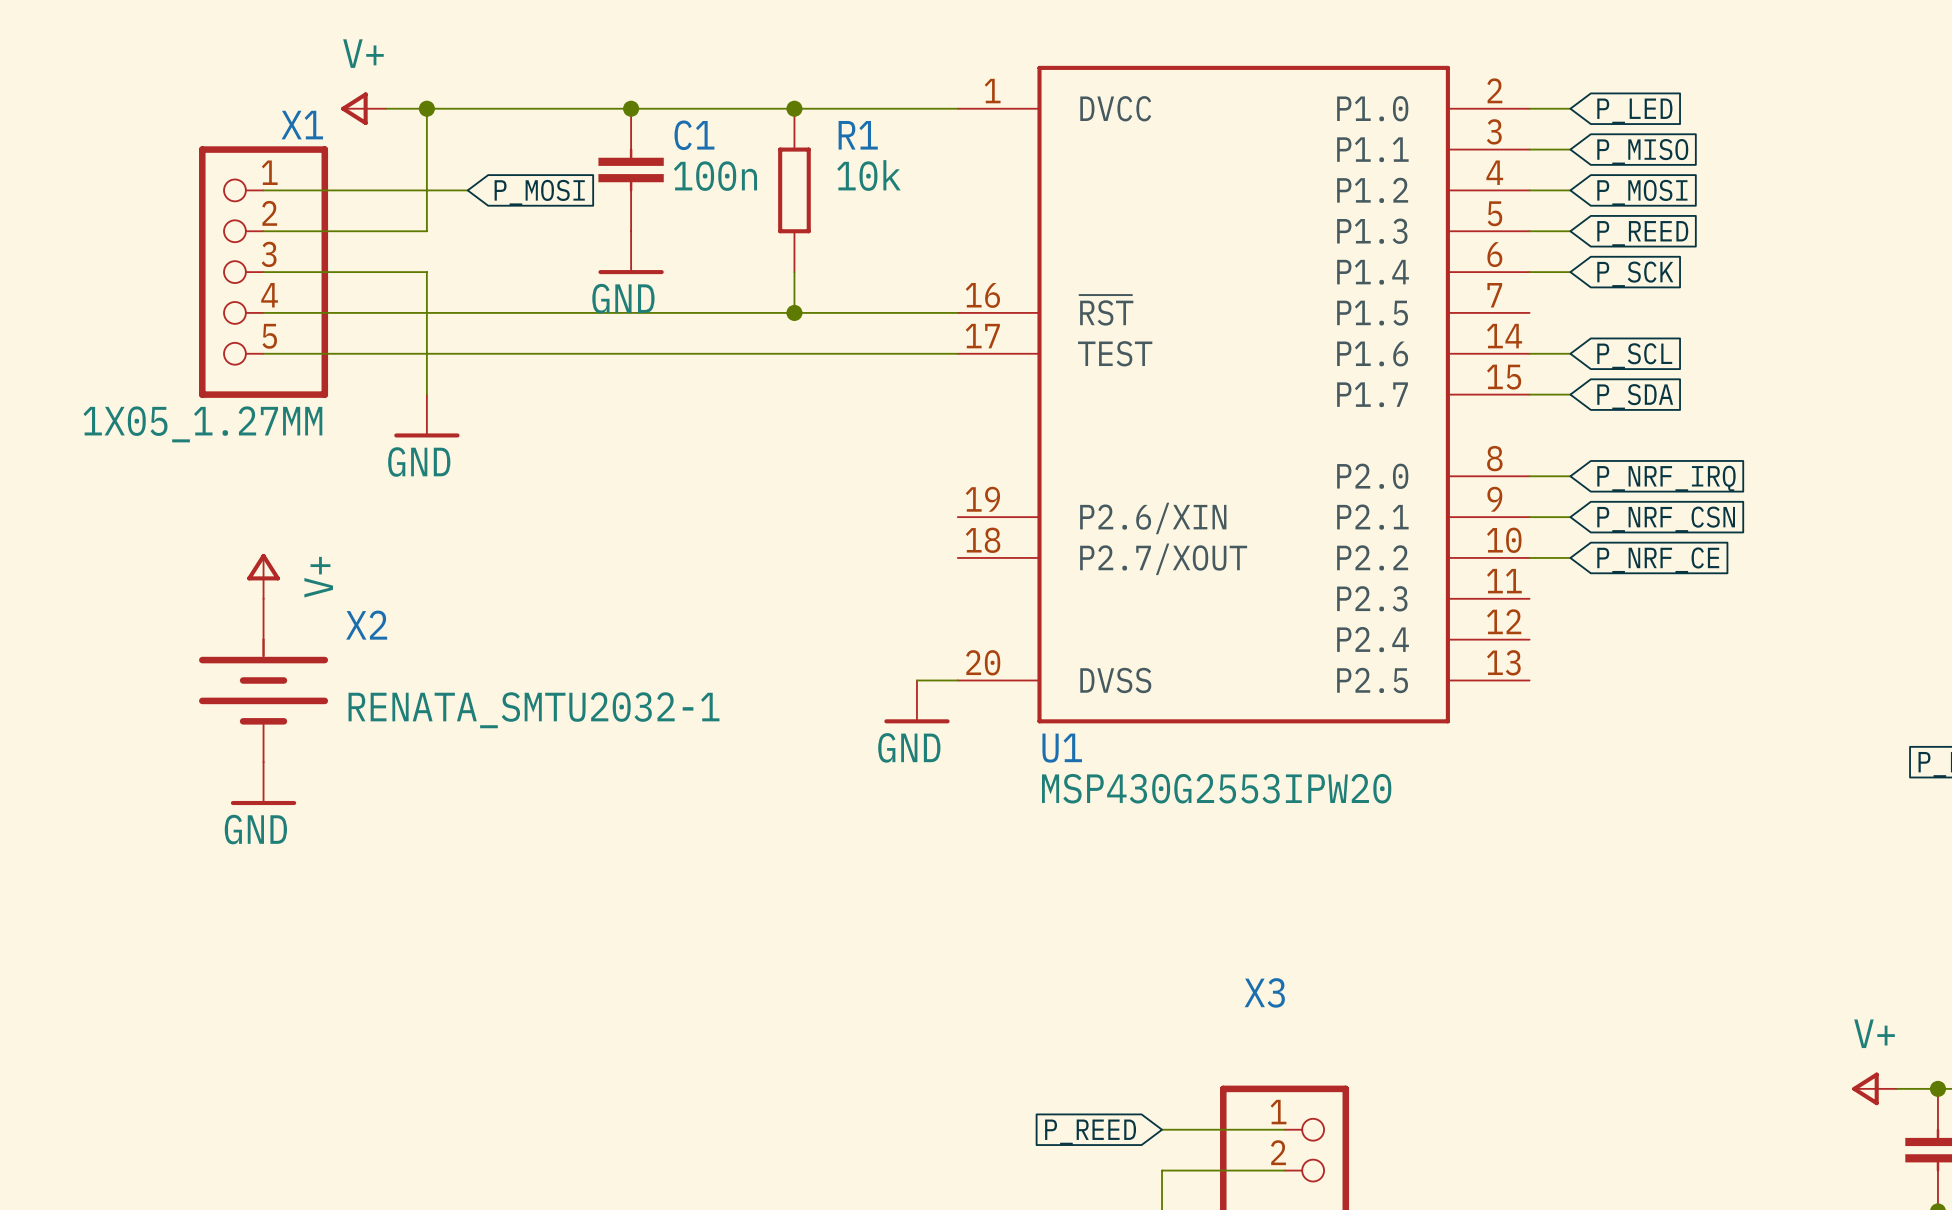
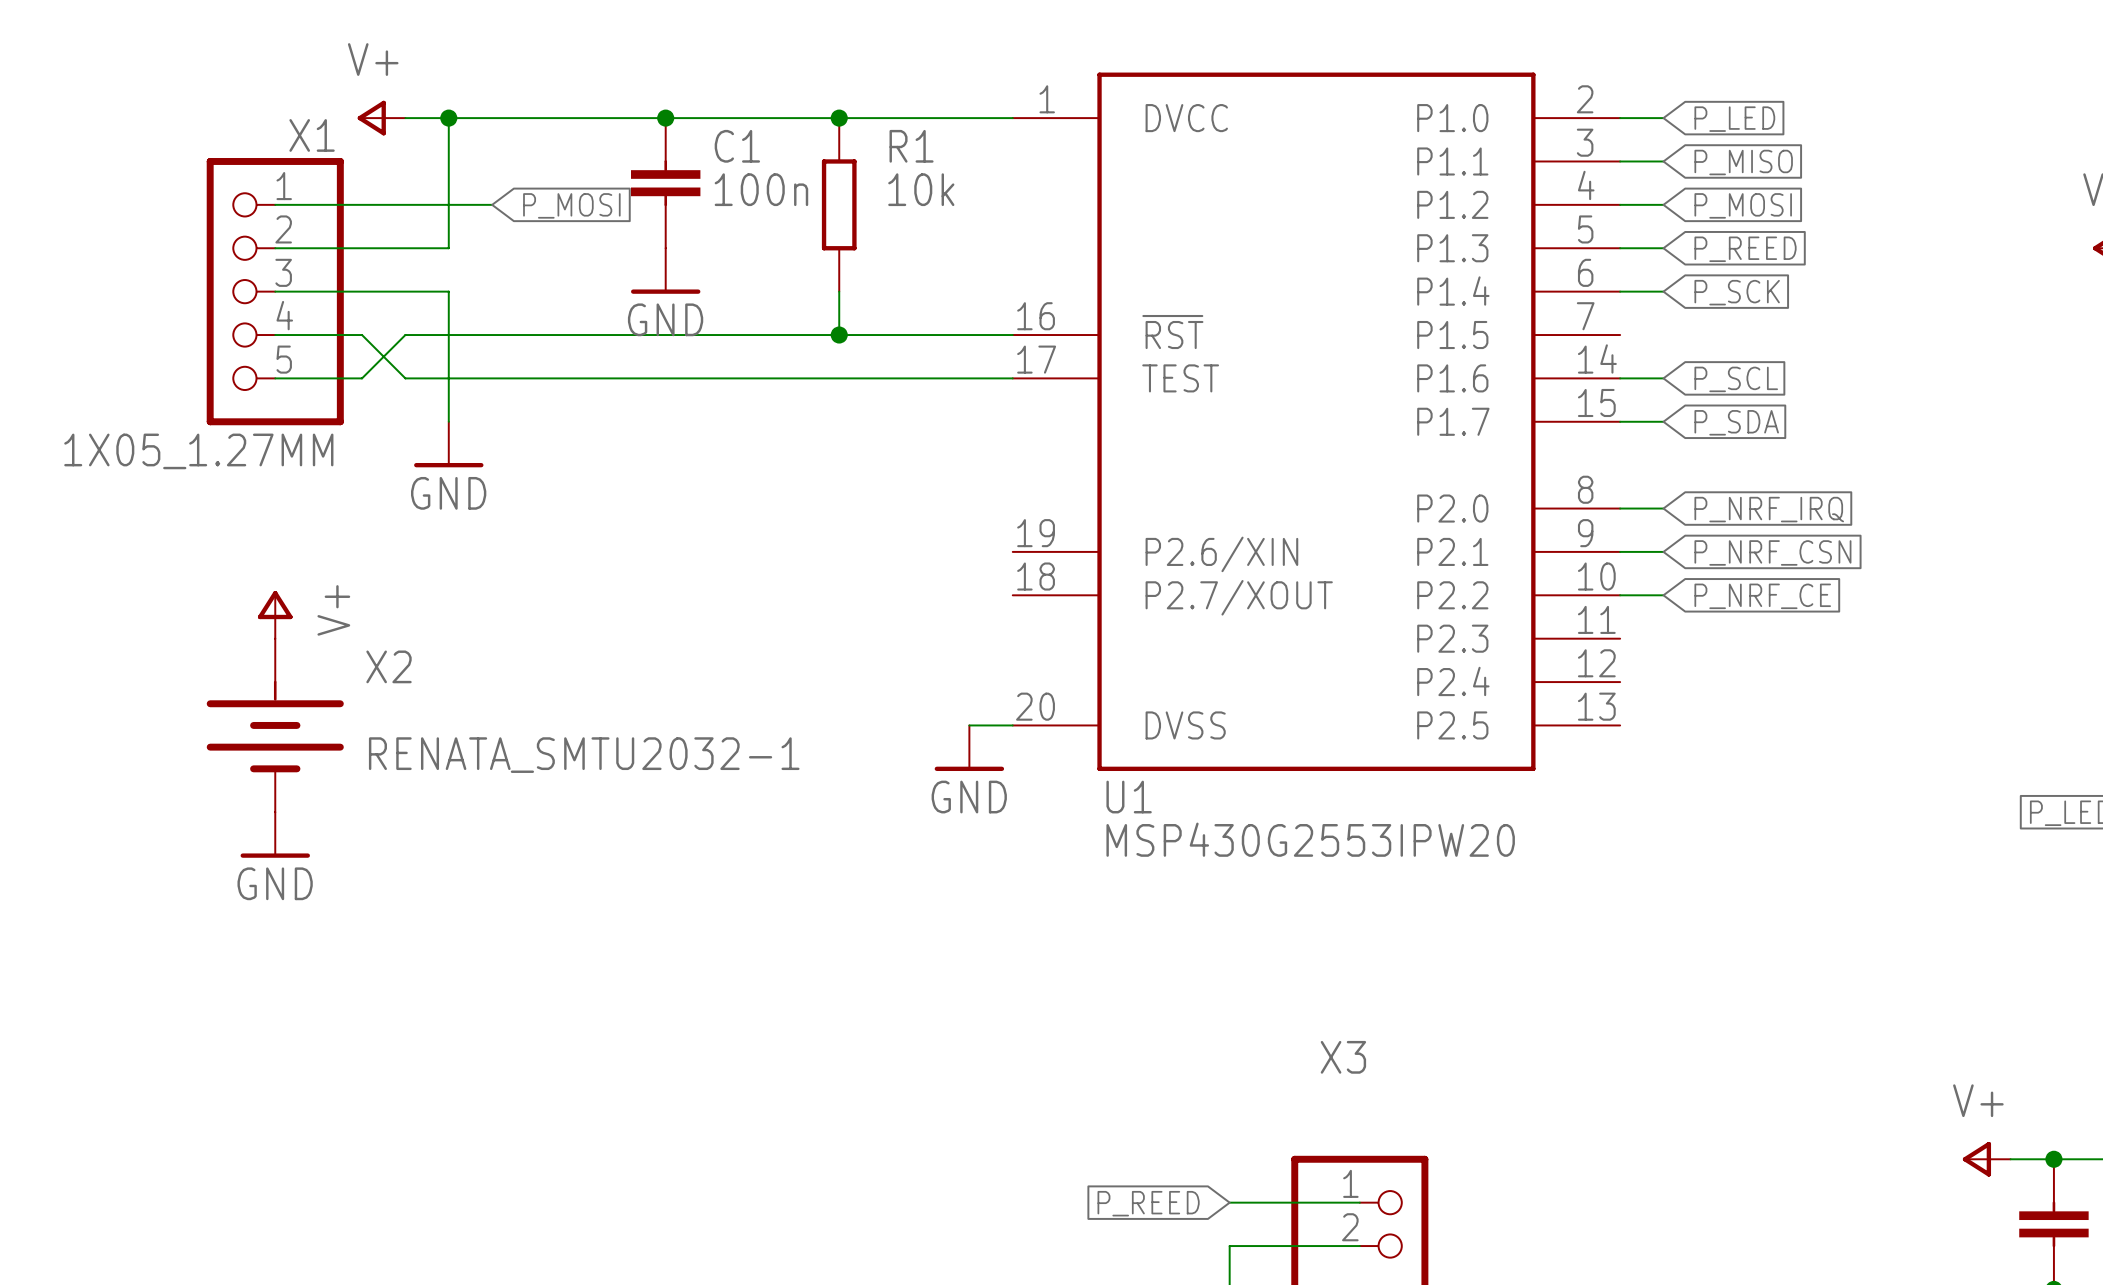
wire: (345, 312) (386, 312) -> (362, 335) (405, 378)
wire: (345, 353) (386, 353) -> (362, 378) (405, 335)

